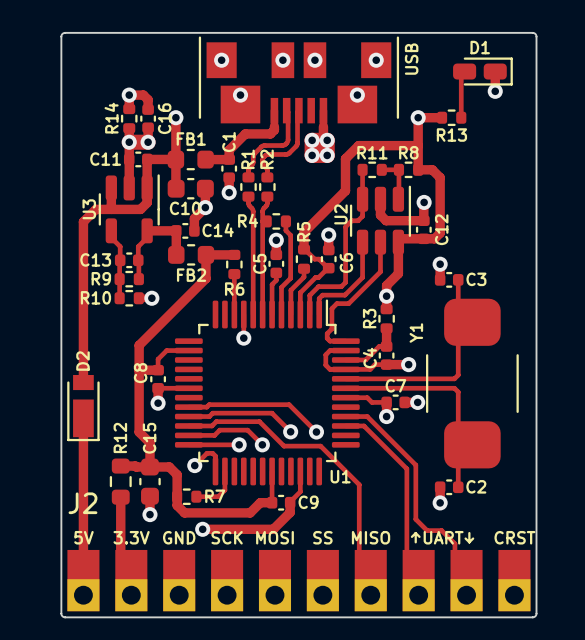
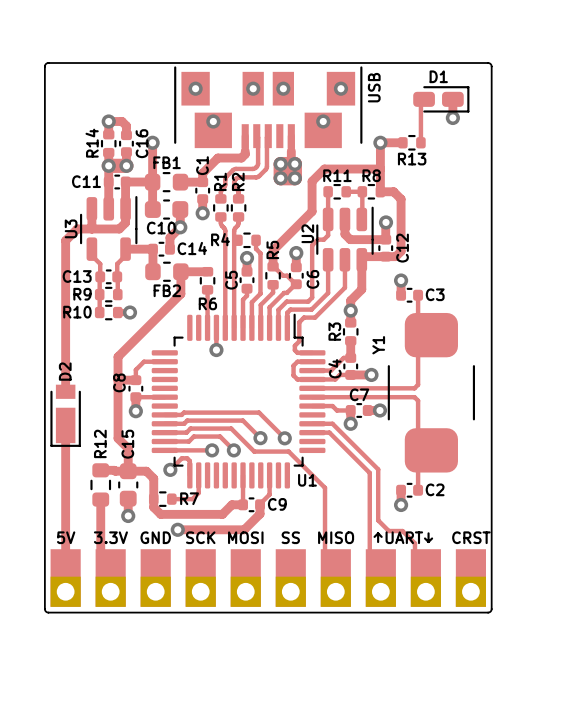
J2 name: J2 (82, 503) -> none

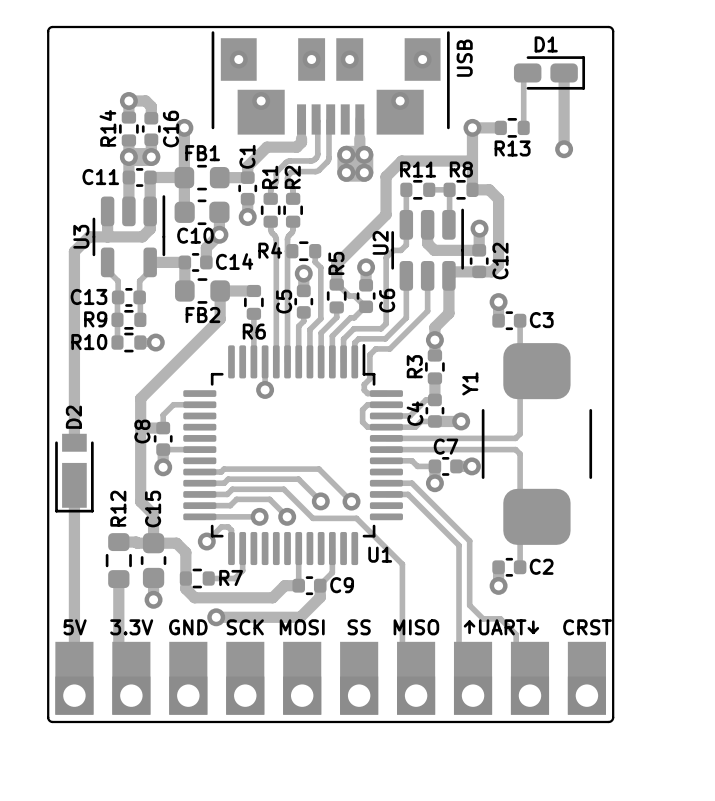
track: none -> (564, 96) (564, 149)
via position: (452, 117) -> (564, 149)

